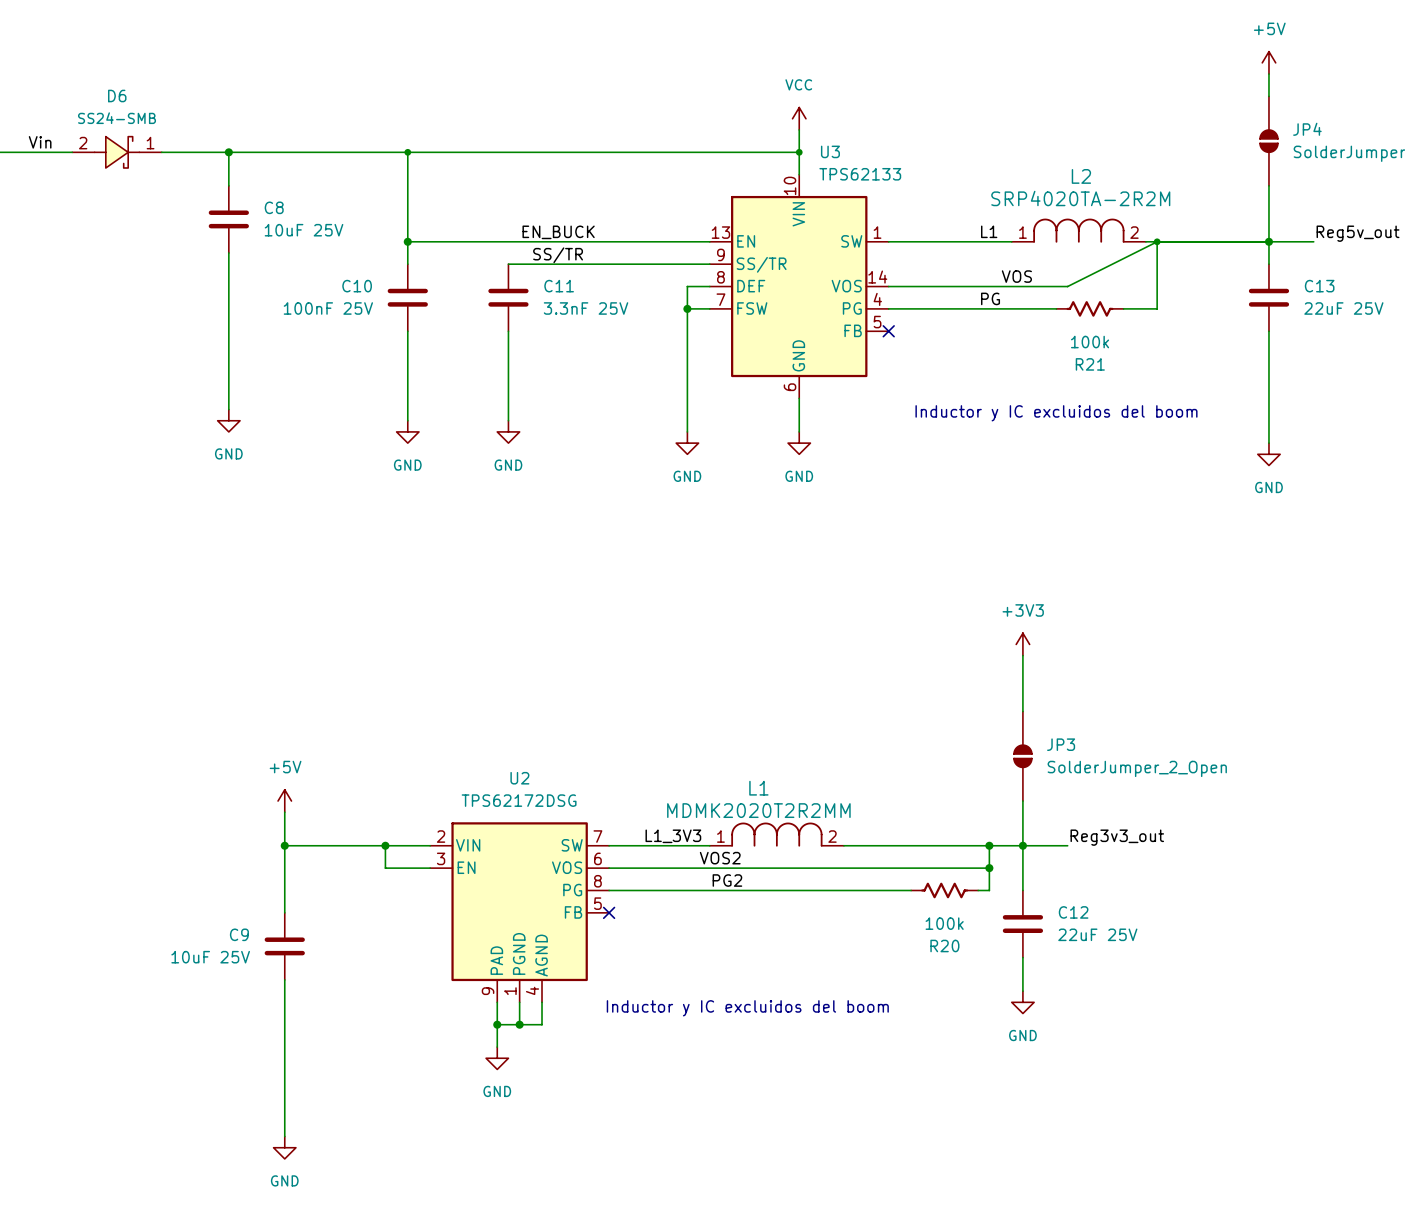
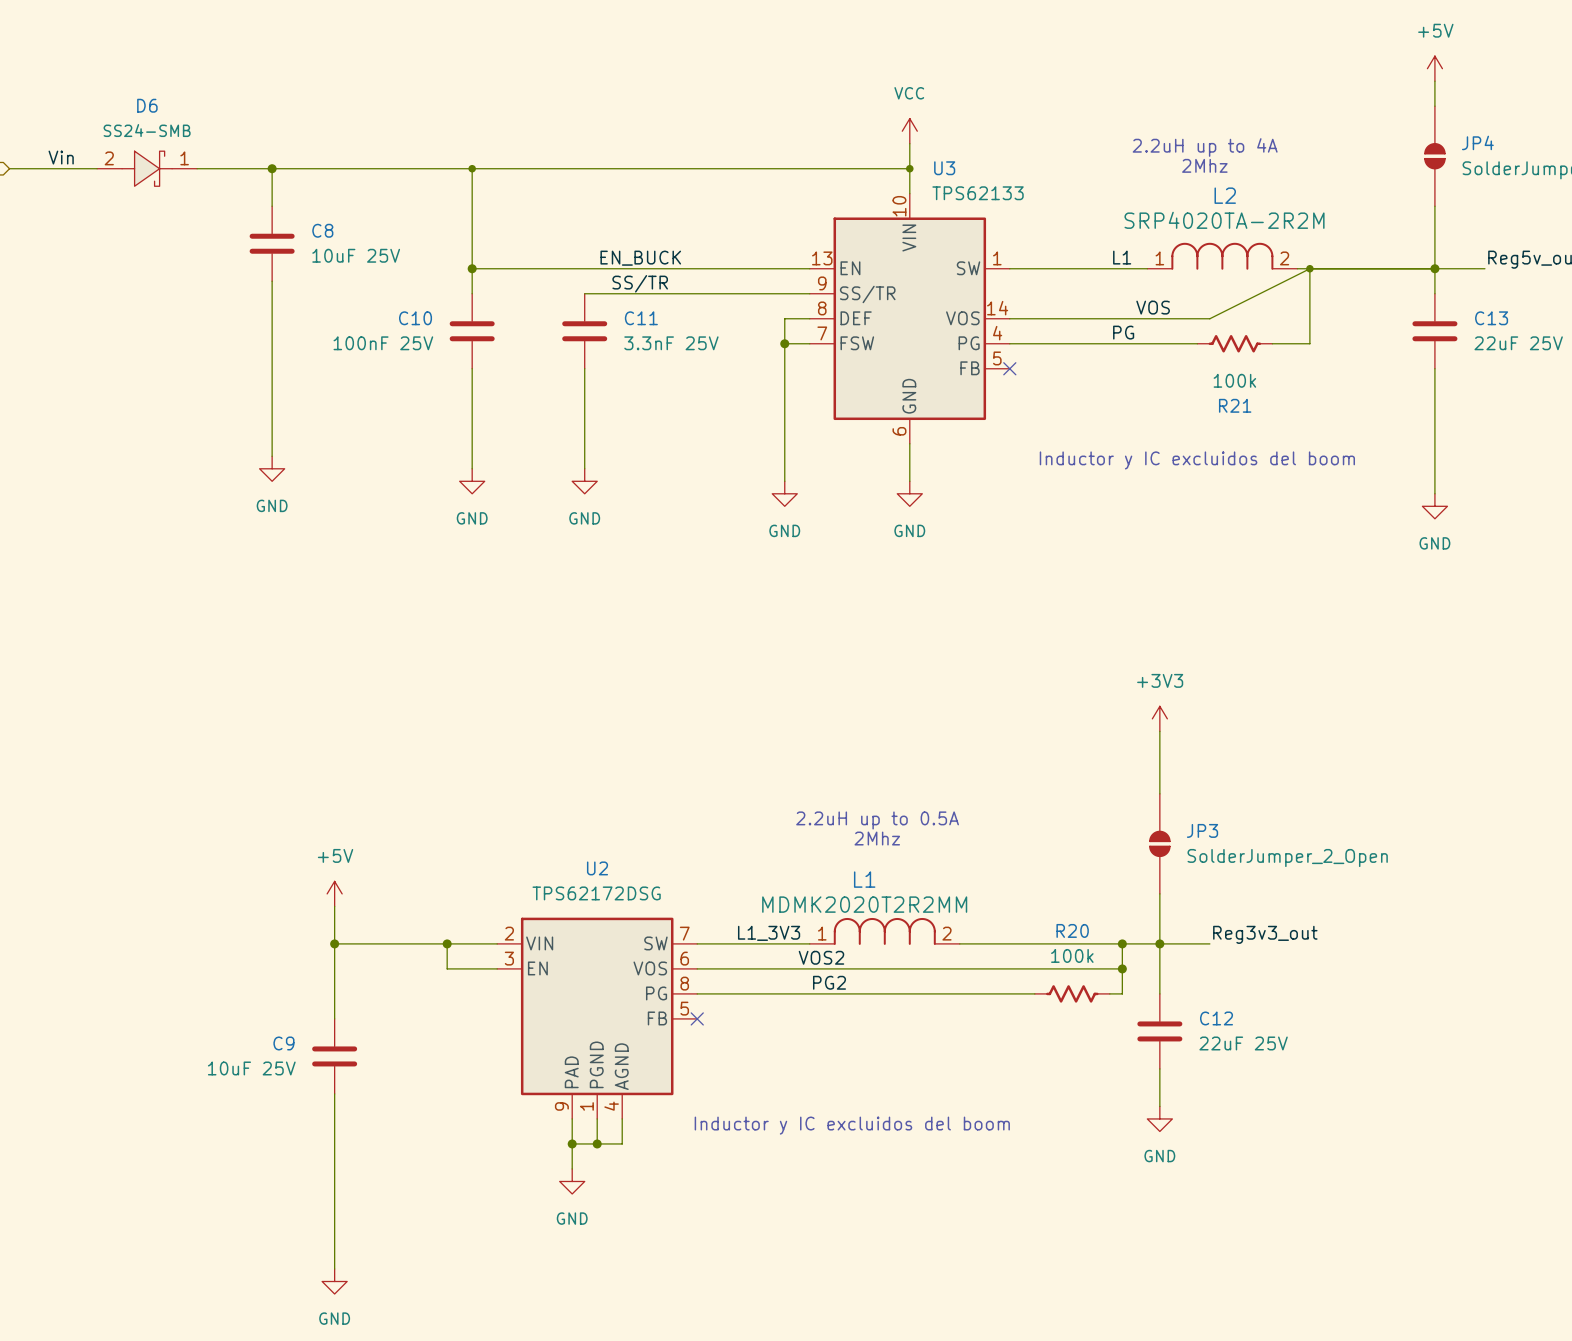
text: none -> 2.2uH up to 4A (1205, 147)
text: none -> 2Mhz (1204, 165)
text: none -> 2.2uH up to 0.5A (877, 820)
text: none -> 2Mhz (877, 838)
R20 rotation: 0° (944, 890) -> 180° (1072, 993)

